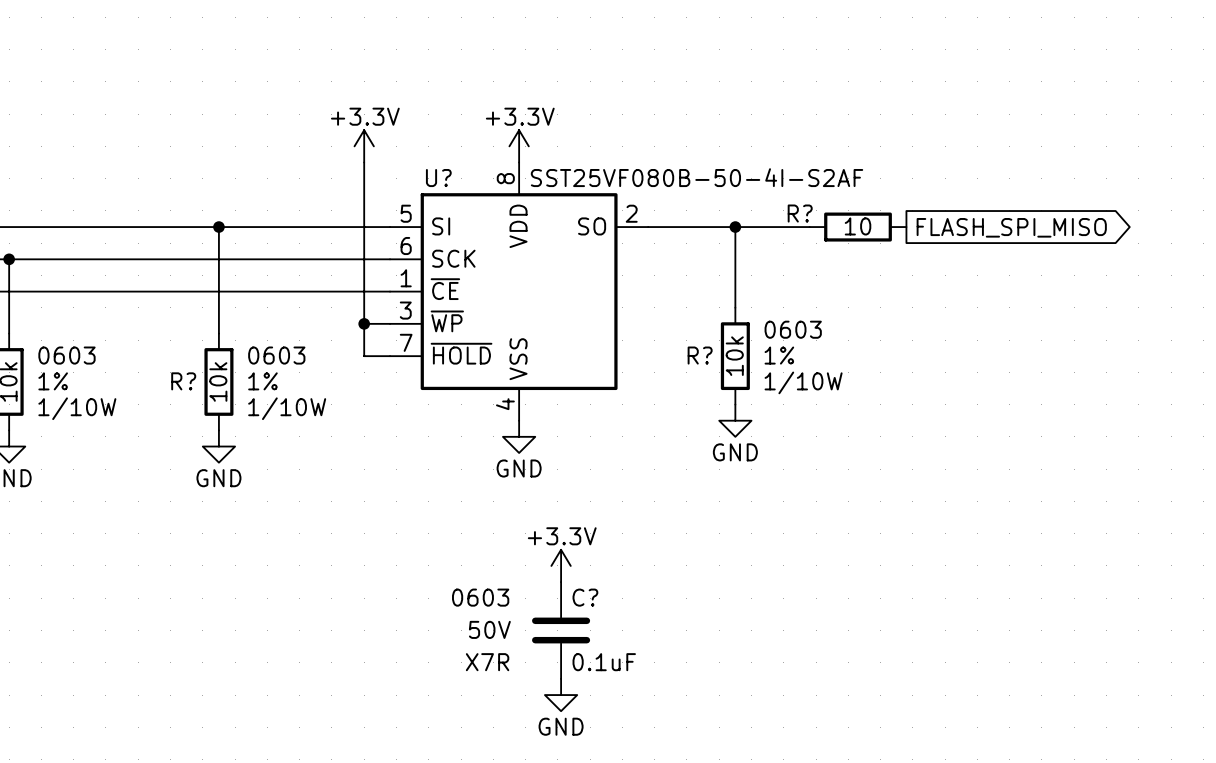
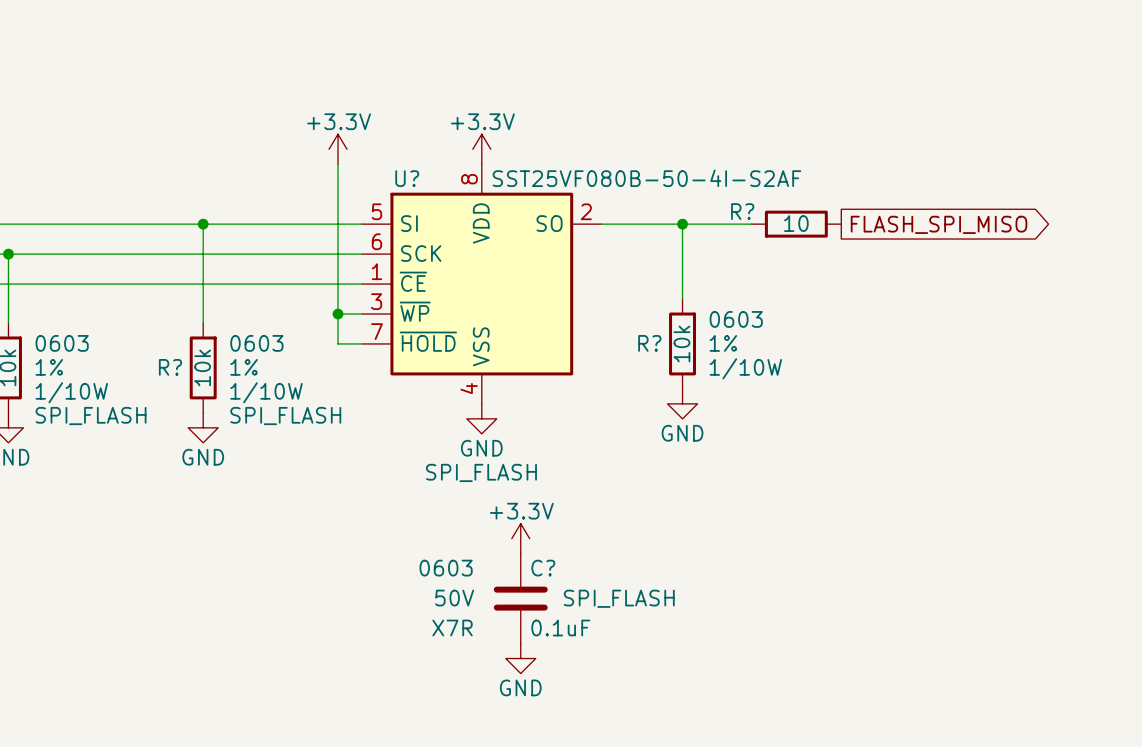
part text: none -> SPI_FLASH (91, 416)
R? text: none -> SPI_FLASH (285, 416)
U? text: none -> SPI_FLASH (481, 472)
C? text: none -> SPI_FLASH (619, 598)

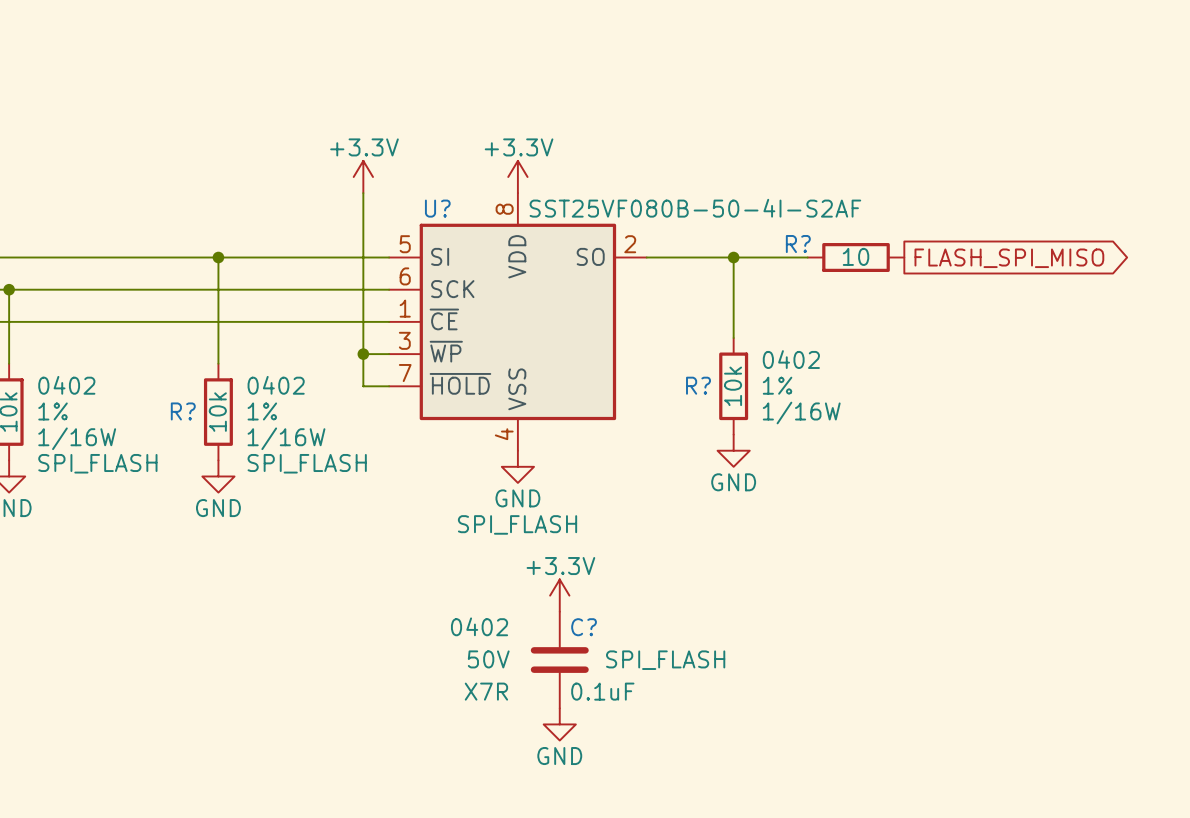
R? text: 0603 (736, 319) -> 0402 (791, 359)
part text: 0603 (62, 343) -> 0402 (66, 385)
R? text: 0603 (256, 343) -> 0402 (276, 385)
R? text: 1/10W (745, 368) -> 1/16W (801, 413)
part text: 1/10W (71, 392) -> 1/16W (77, 438)
R? text: 1/10W (266, 392) -> 1/16W (286, 438)
C? text: 0603 (446, 568) -> 0402 (479, 626)

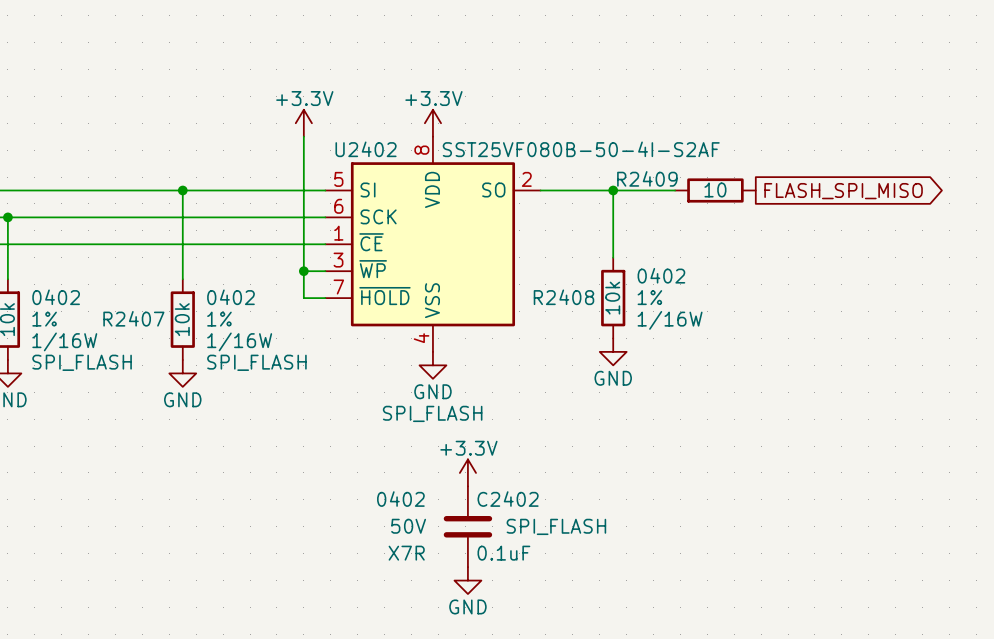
U? name: U? (437, 208) -> U2402 (366, 149)
R? name: R? (798, 244) -> R2409 (647, 178)
R? name: R? (698, 385) -> R2408 (563, 297)
R? name: R? (183, 411) -> R2407 (133, 318)
C? name: C? (584, 627) -> C2402 (508, 499)

